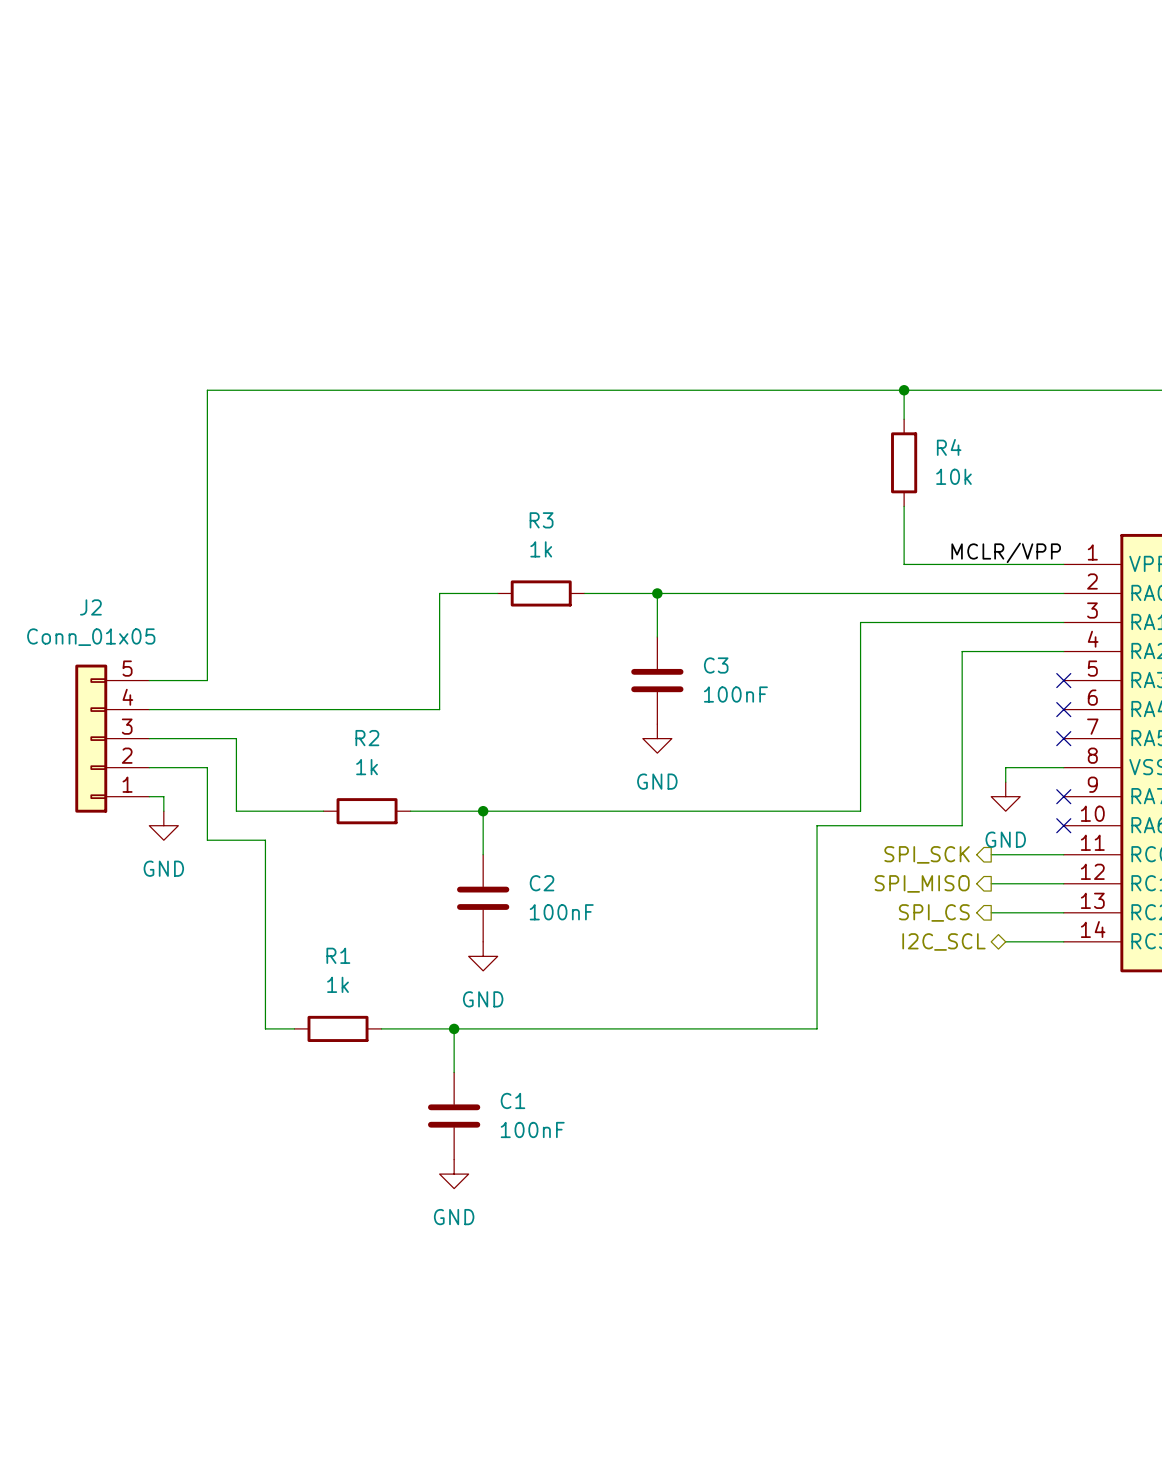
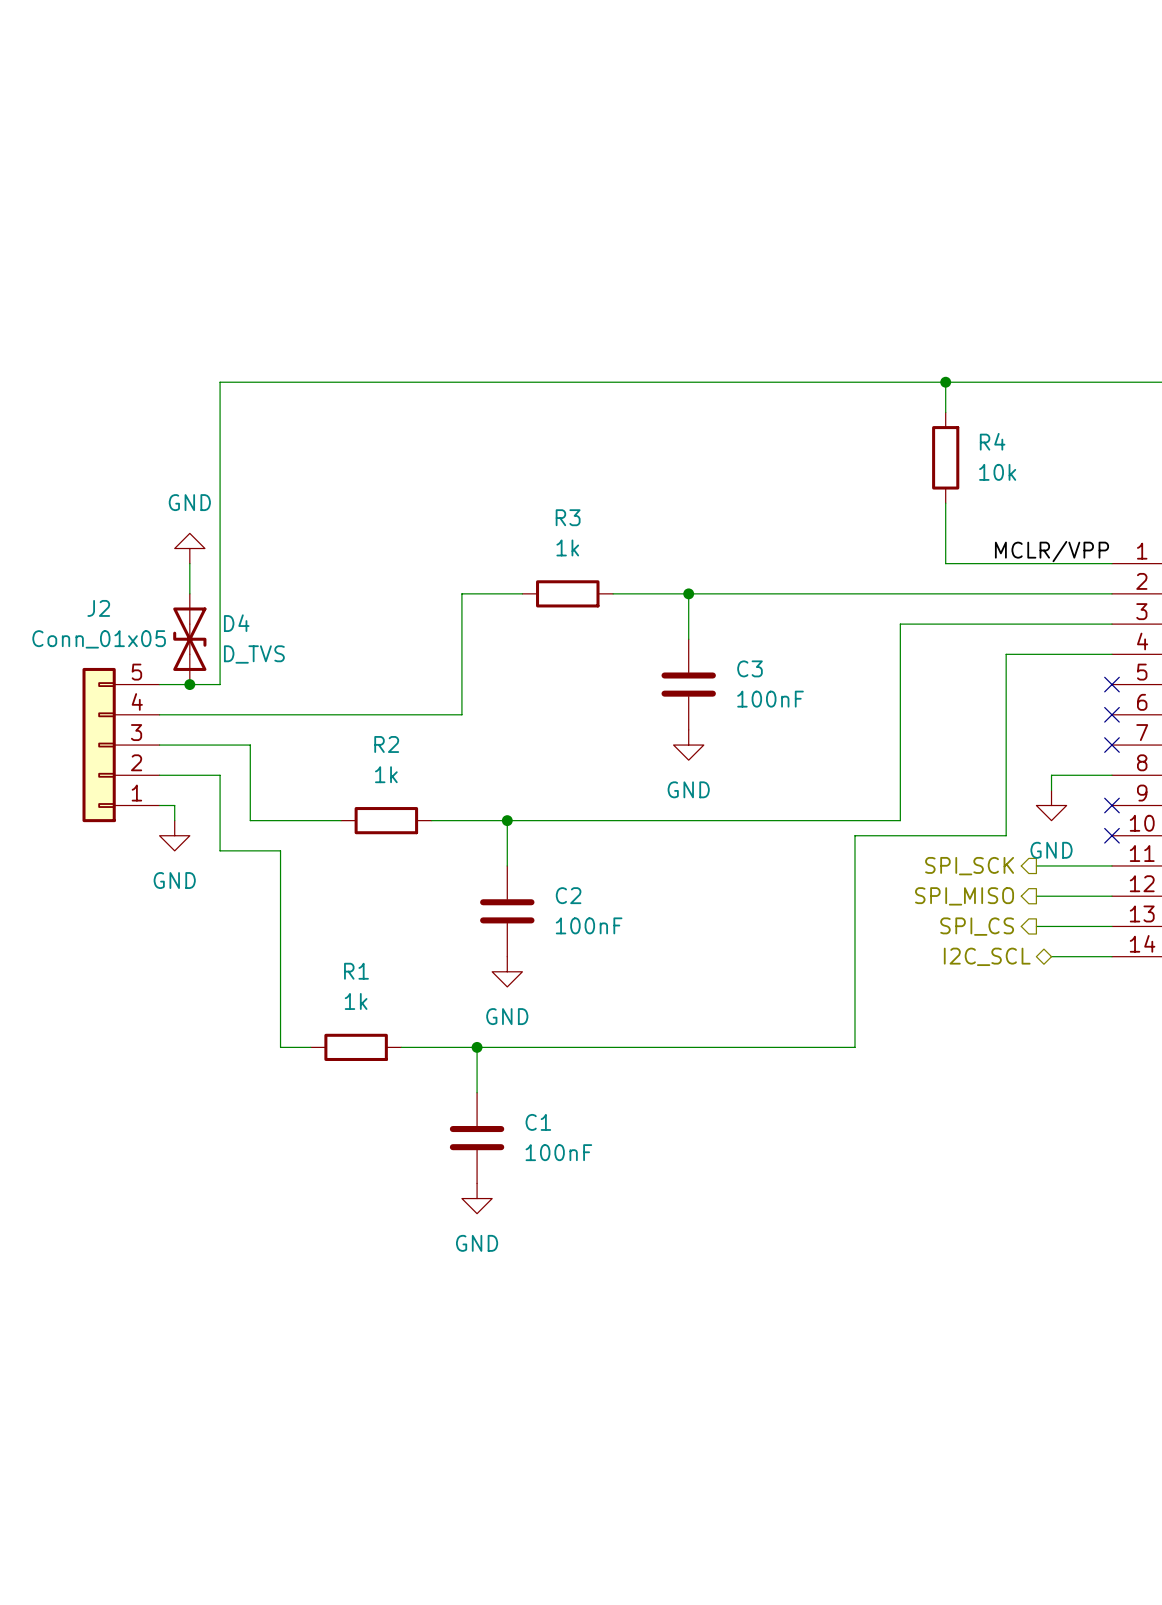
power symbol: none -> GND (189, 548)
wire: none -> (189, 563) (189, 593)
D4: none -> D_TVS (189, 639)
junction: none -> (189, 684)

